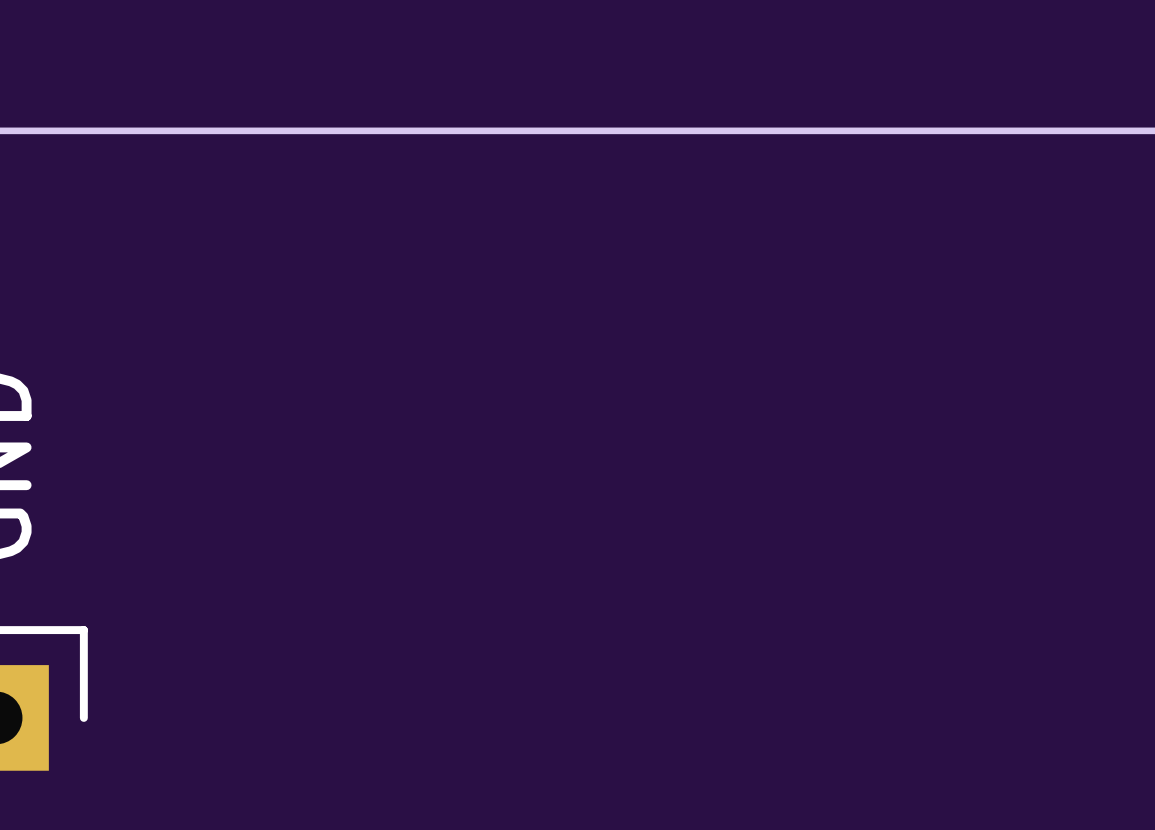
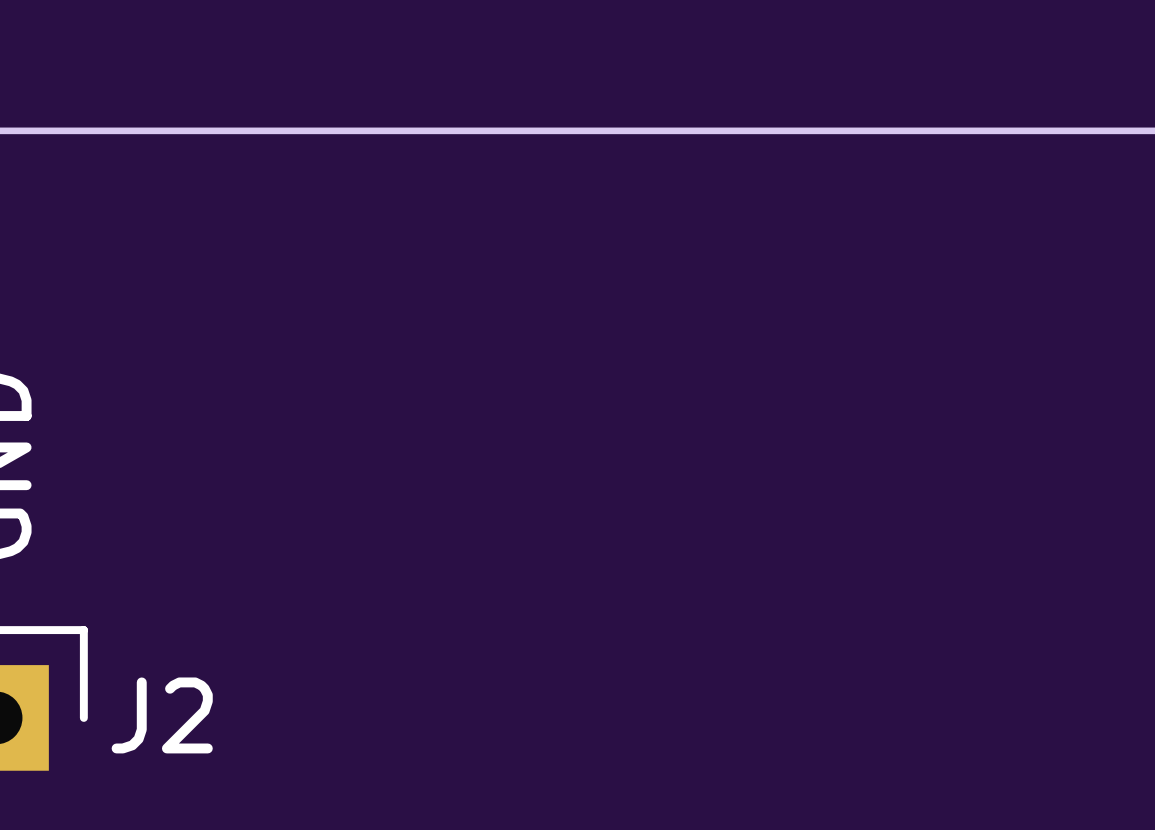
J2 name: none -> J2 (162, 715)

